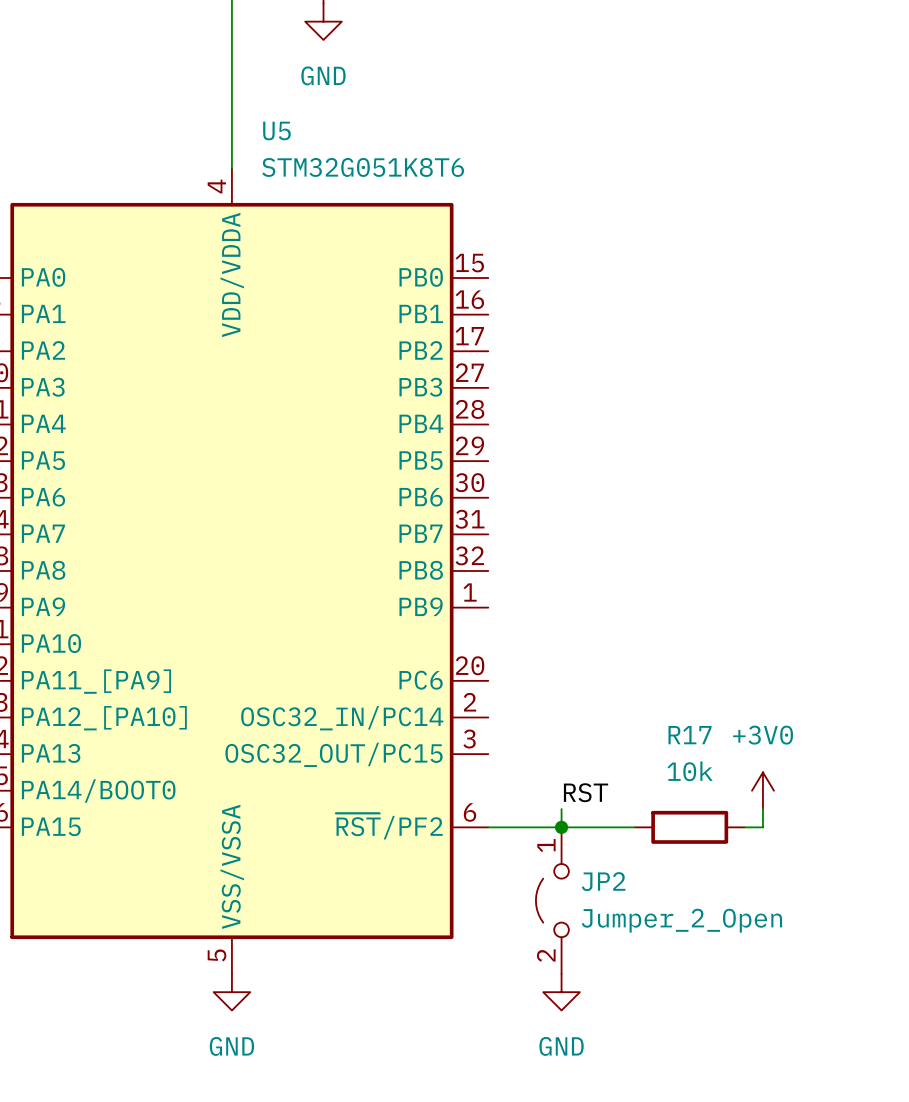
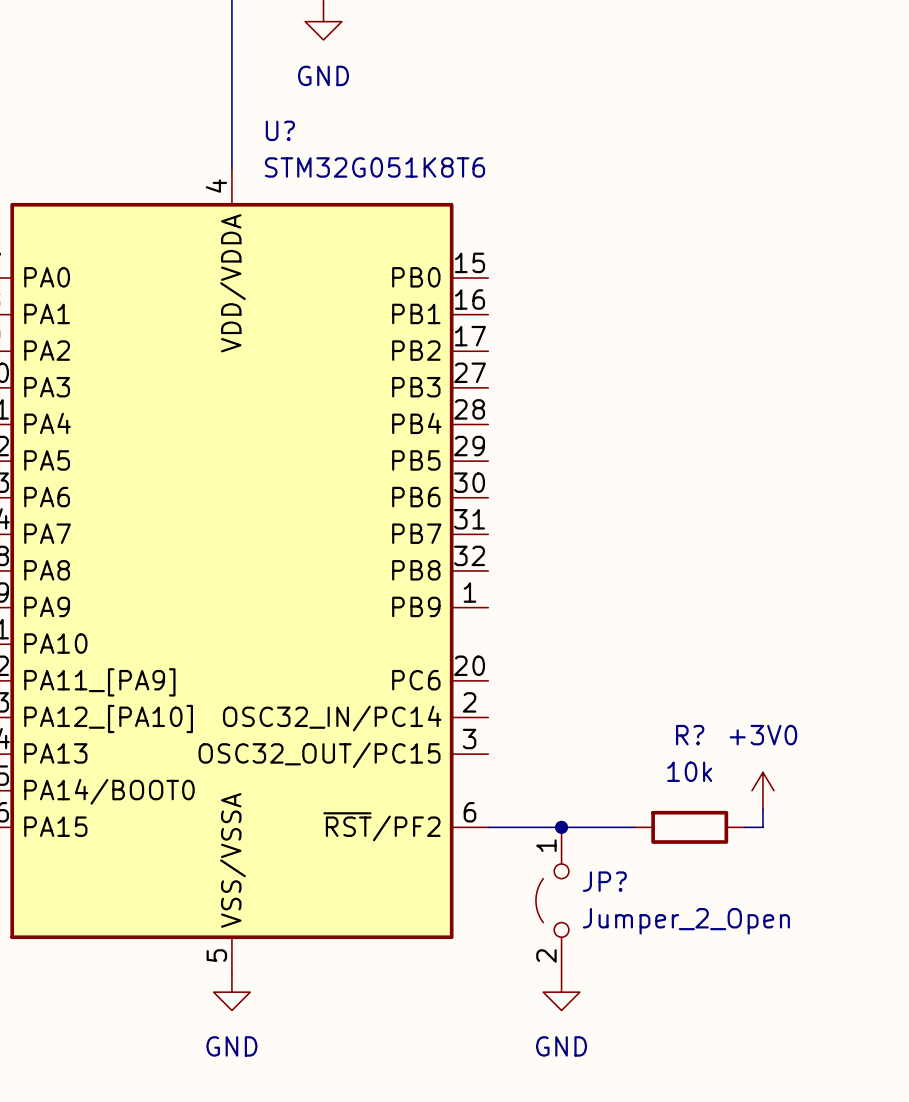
U5 name: U5 (276, 130) -> U? (280, 130)
R17 name: R17 (690, 735) -> R? (690, 735)
label: RST (586, 792) -> none
wire: (561, 809) (561, 827) -> none
JP2 name: JP2 (603, 881) -> JP? (604, 881)

